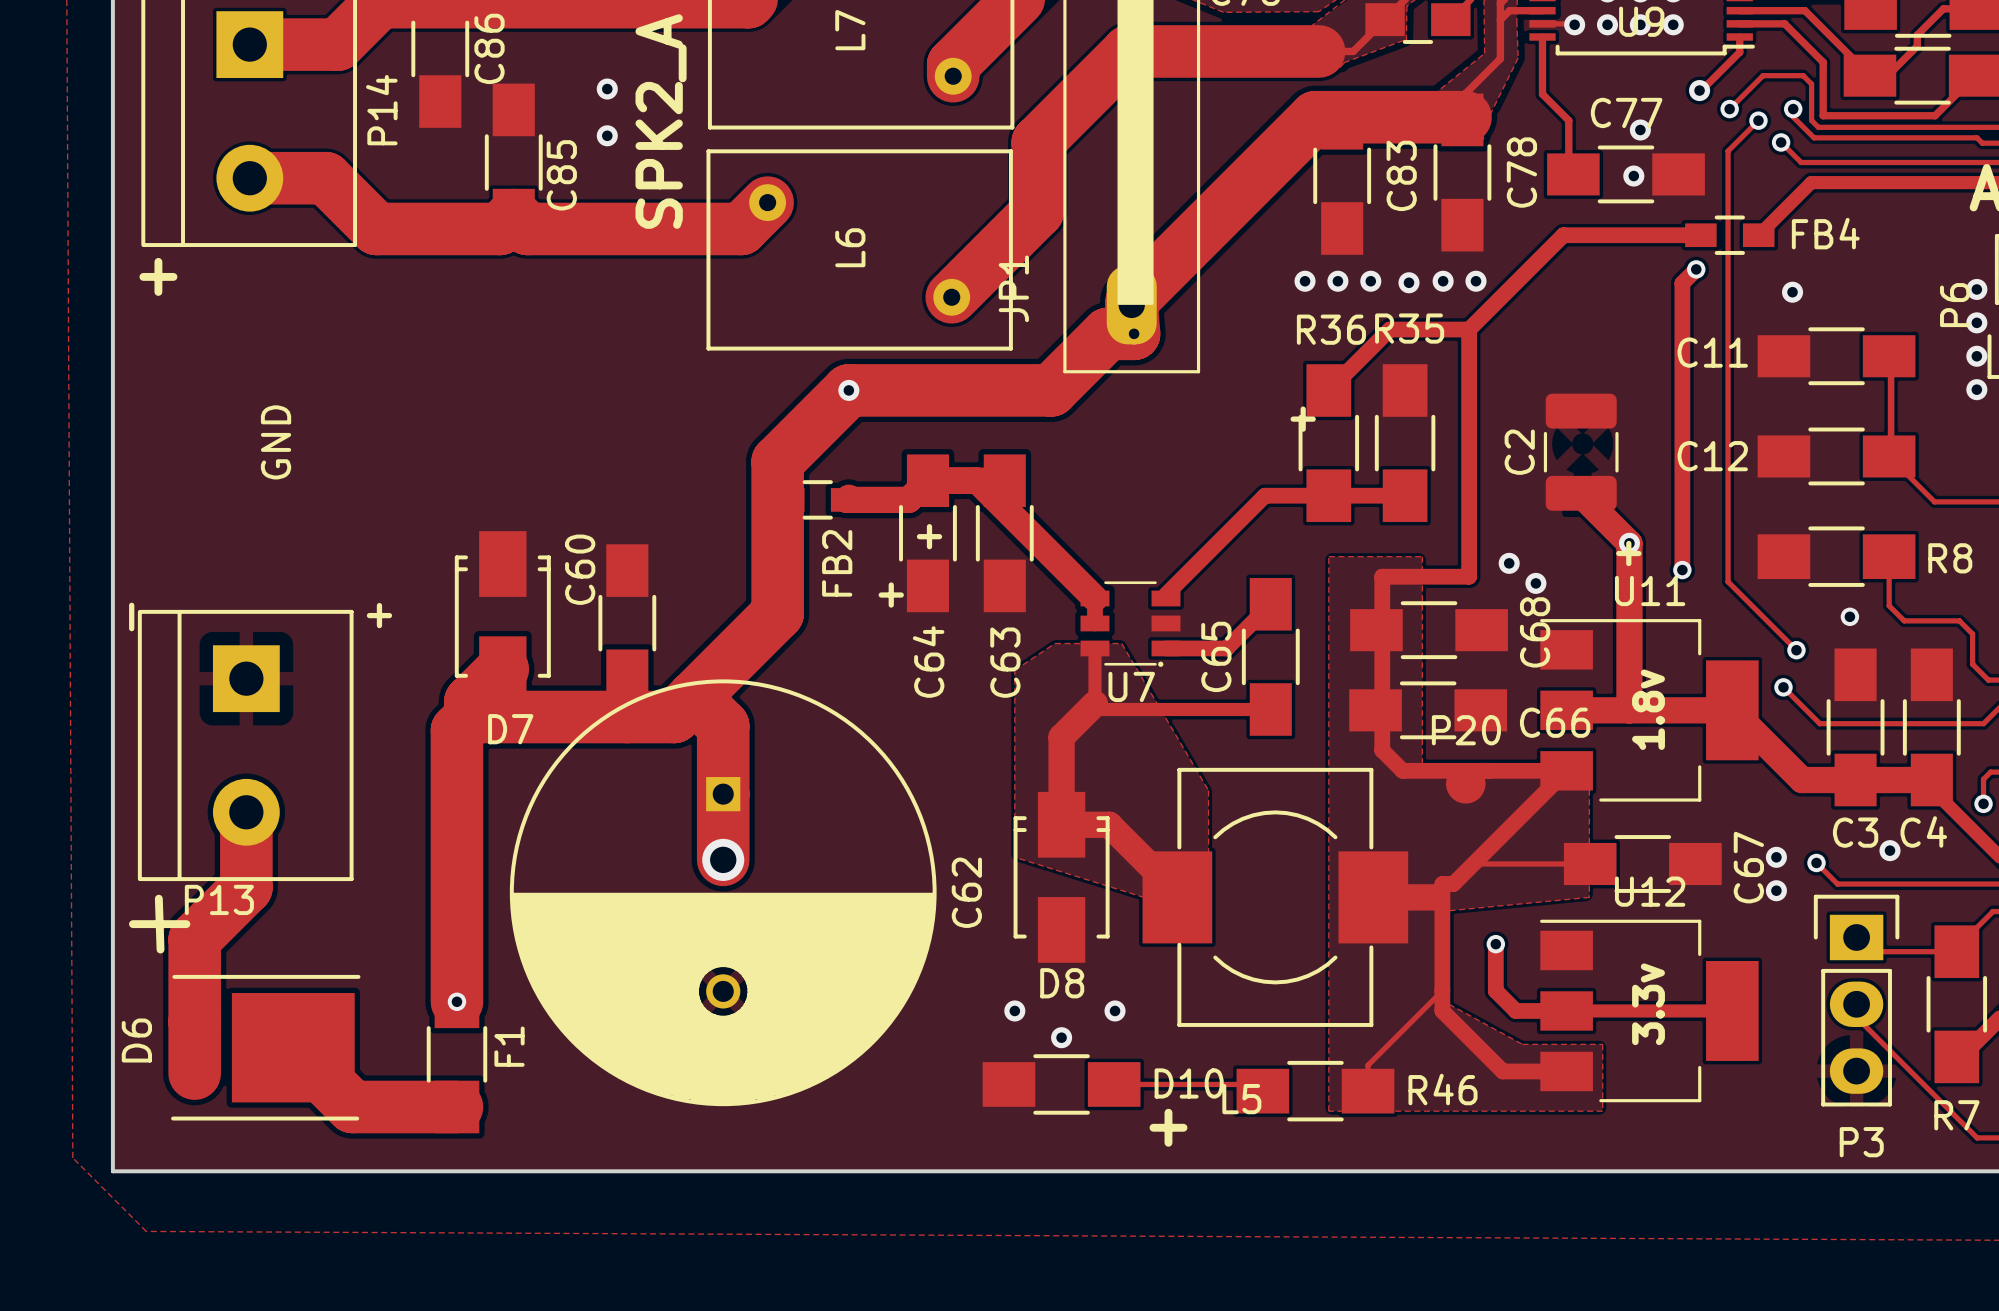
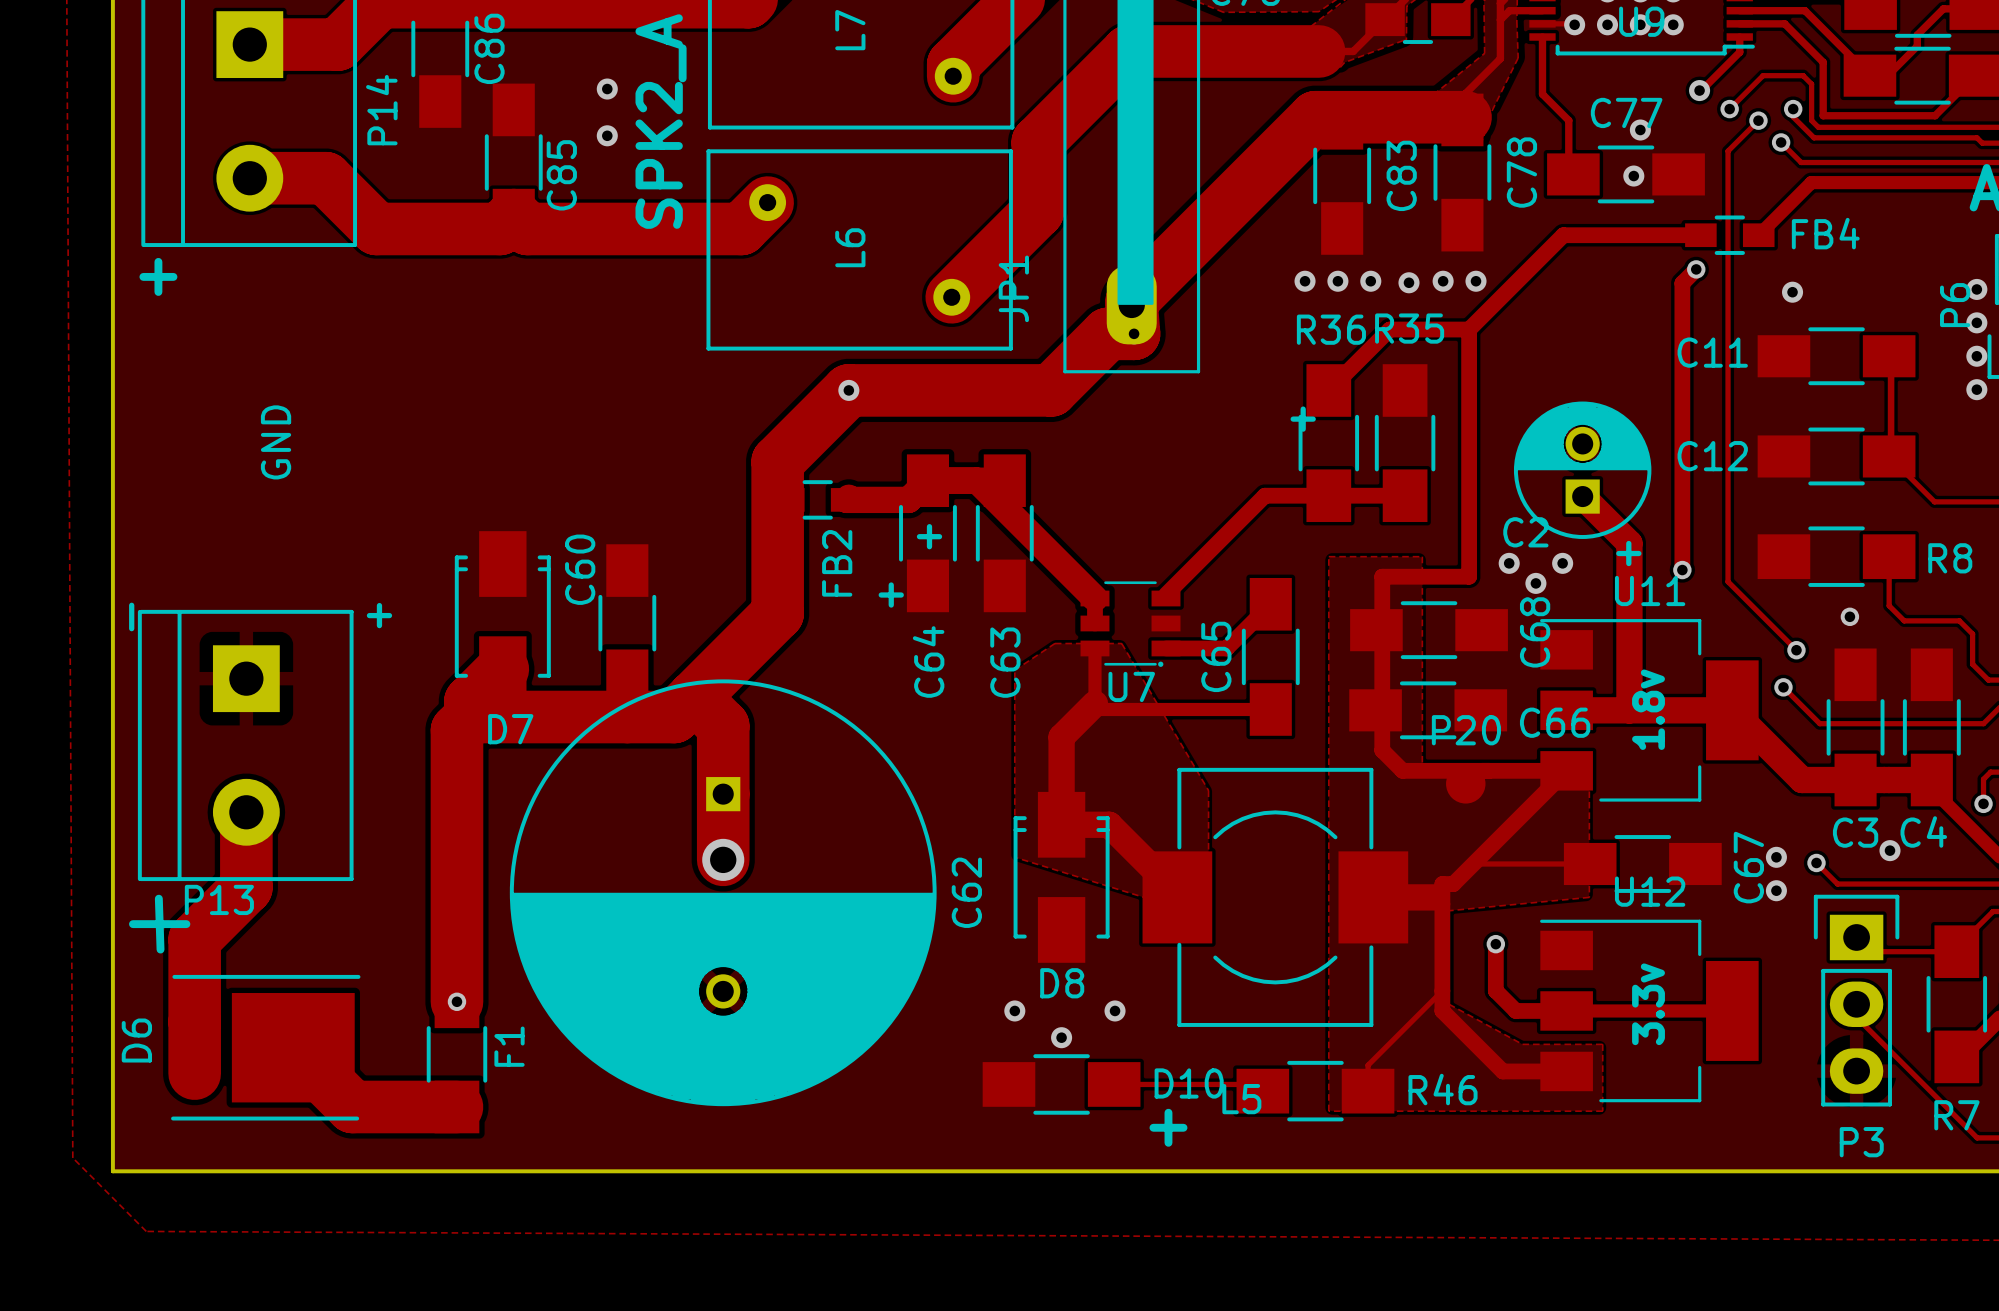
C2 footprint: [1543, 393, 1619, 511] -> [1513, 401, 1652, 539]
C2 name position: C2 (1519, 452) -> C2 (1525, 532)
via position: (1629, 543) -> (1562, 563)

